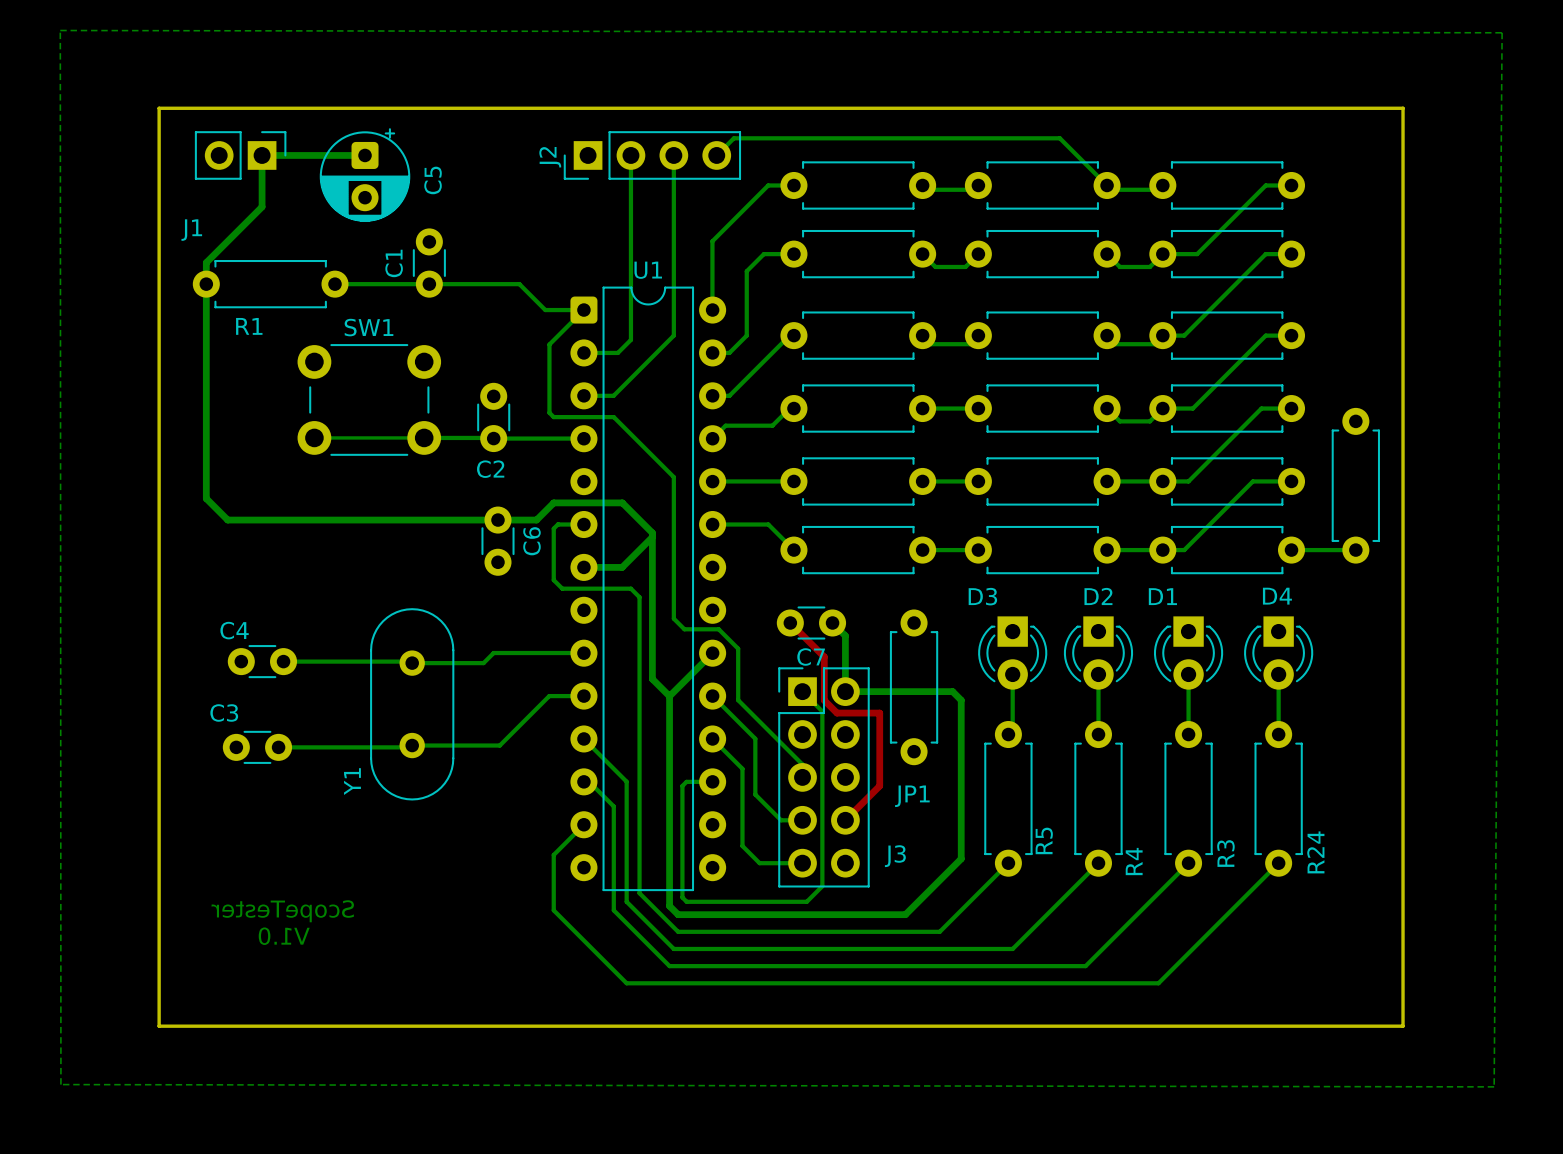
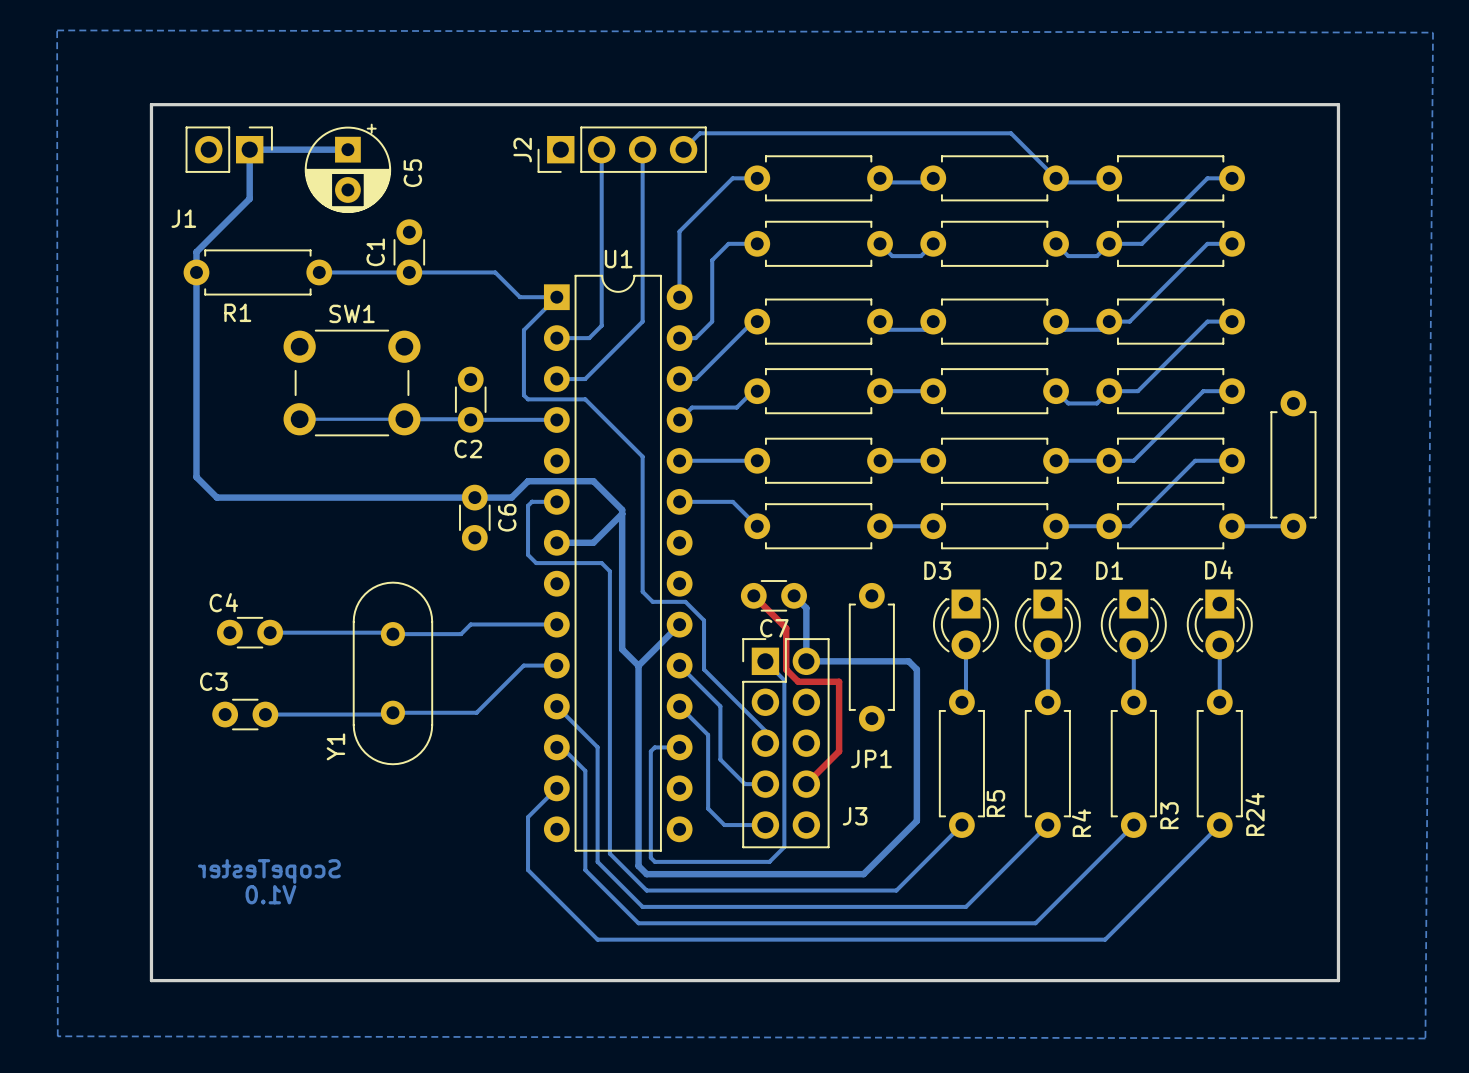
C5 footprint: [319, 128, 411, 222] -> [304, 123, 392, 214]
U1 footprint: [570, 286, 727, 892] -> [543, 274, 693, 852]

